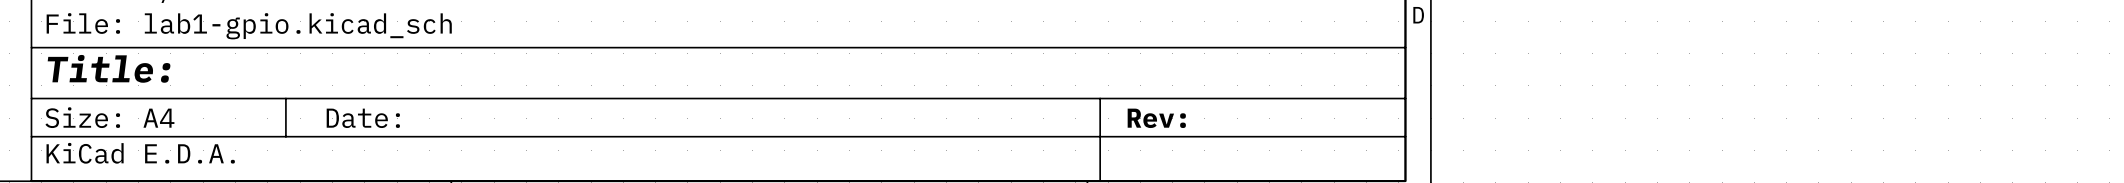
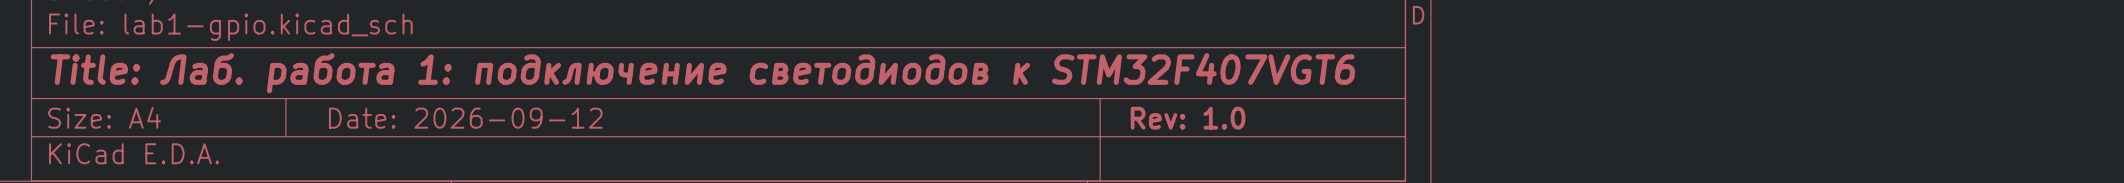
title block: Title: (109, 68) -> Title: Лаб. работа 1: подключение светодиодов к STM32F407VGT6 (702, 73)
title block: Date: (363, 118) -> Date: 2026-09-12 (465, 118)
title block: Rev: (1156, 118) -> Rev: 1.0 (1188, 118)

